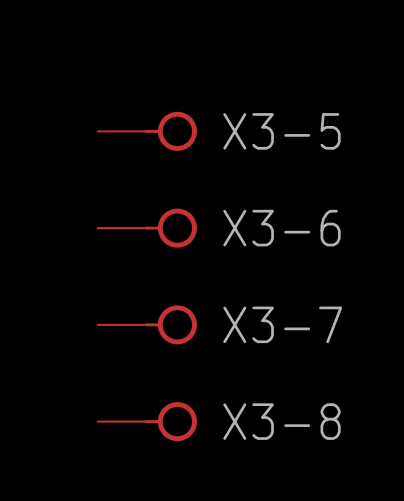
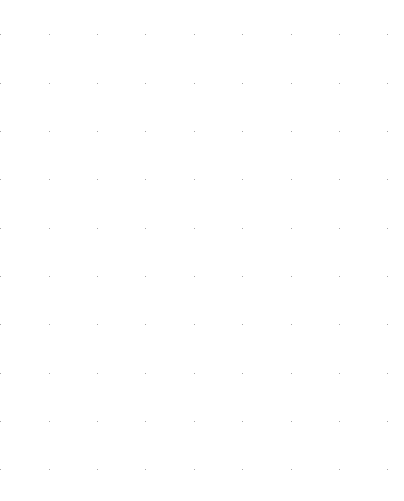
X3-5: (147, 131) -> none
X3-6: (147, 228) -> none
X3-7: (147, 324) -> none
X3-8: (147, 421) -> none

